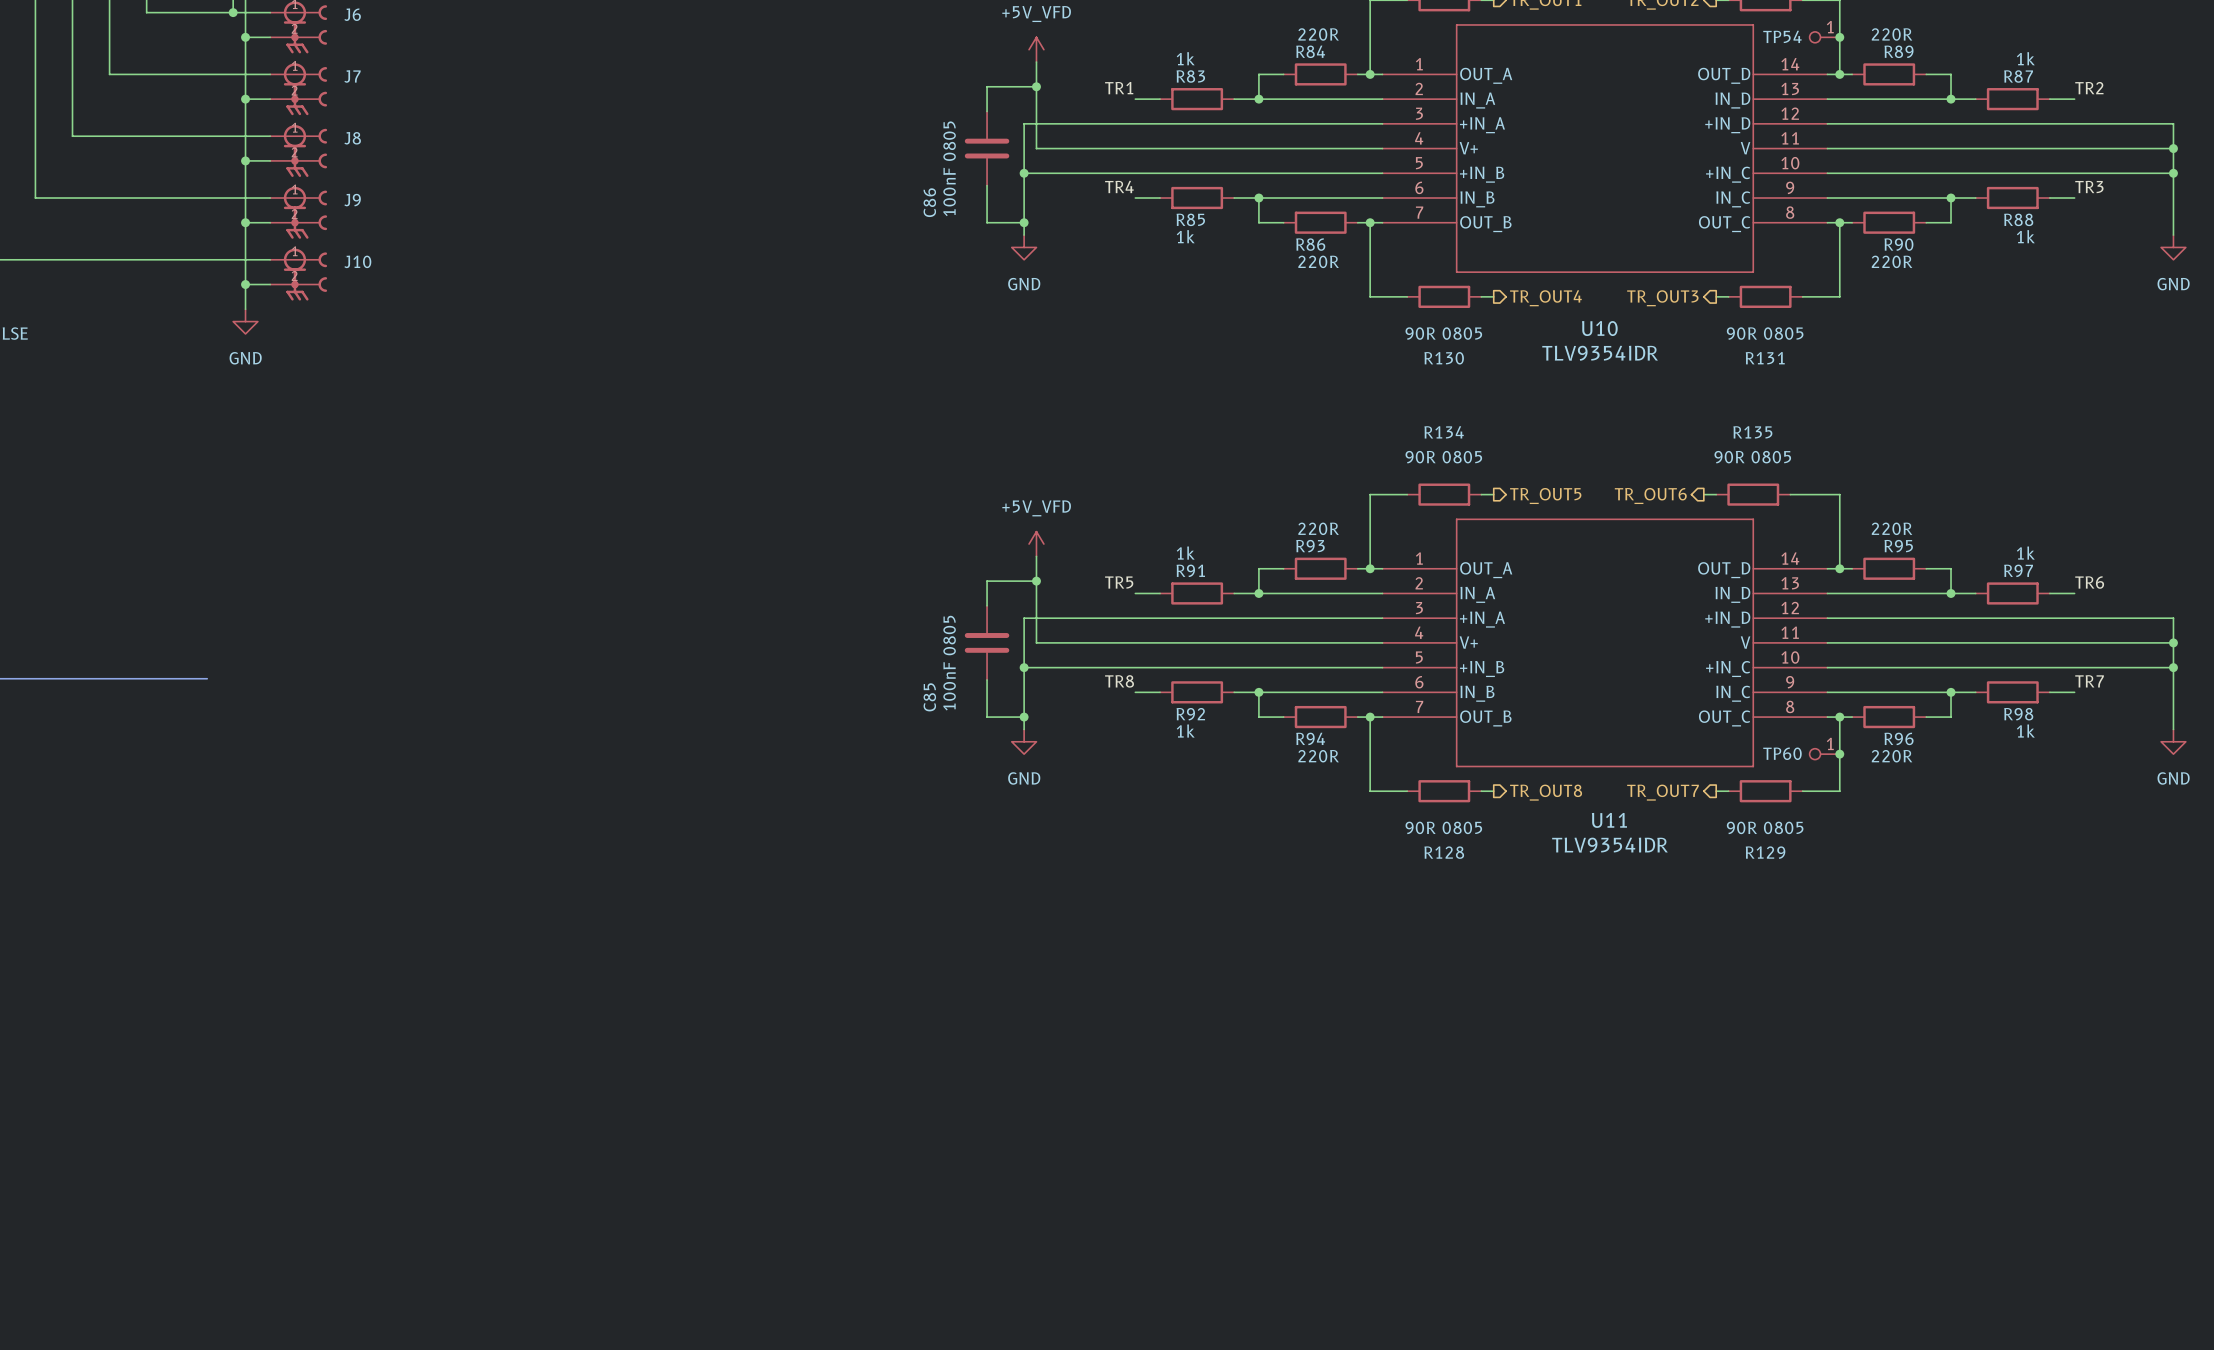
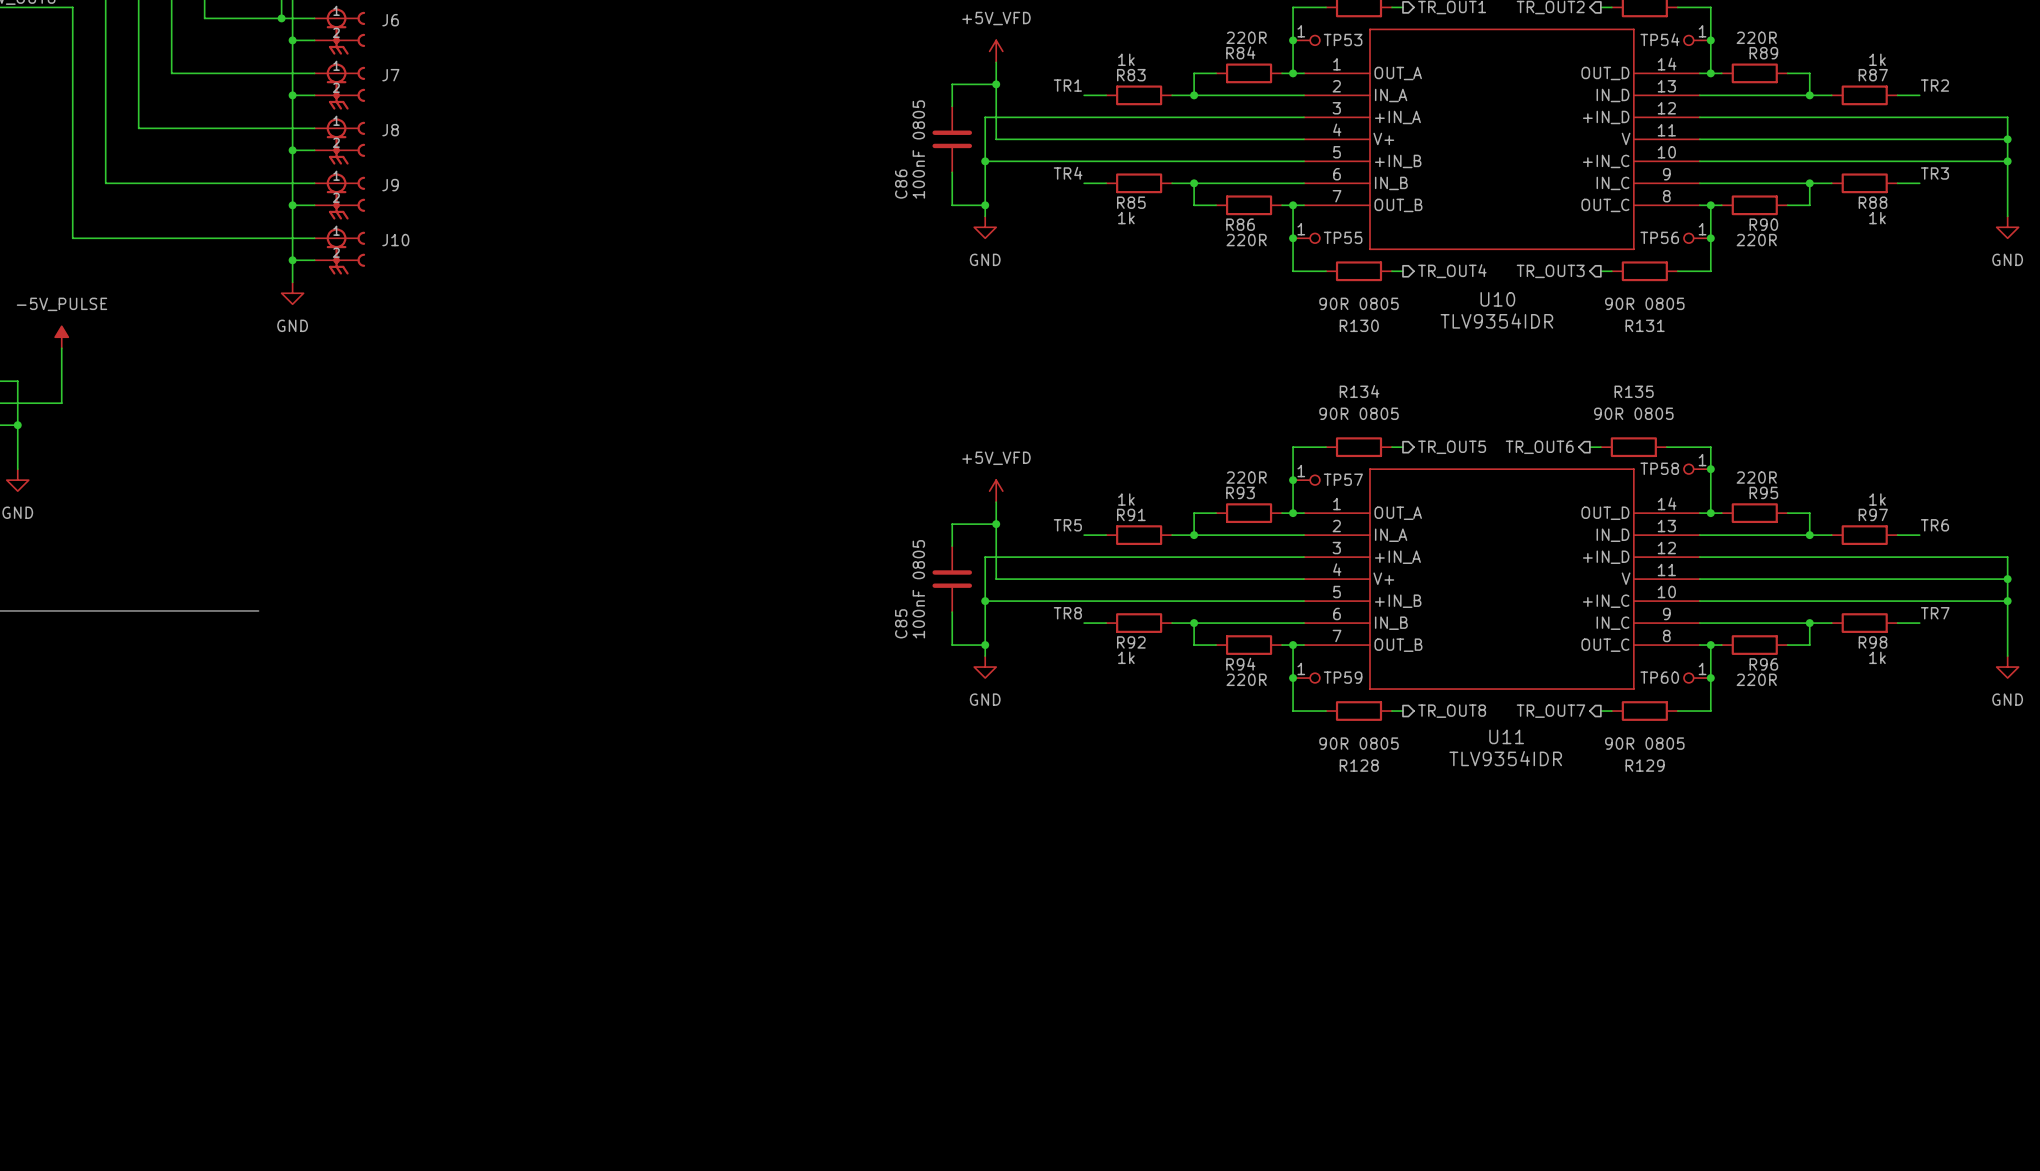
junction: none -> (1293, 40)
TP53: none -> (1306, 40)
junction: none -> (1293, 238)
TP55: none -> (1306, 238)
TP56: none -> (1697, 238)
junction: none -> (1710, 238)
TP58: none -> (1697, 469)
junction: none -> (1710, 469)
junction: none -> (1293, 480)
TP57: none -> (1306, 480)
junction: none -> (1293, 678)
TP59: none -> (1306, 678)

